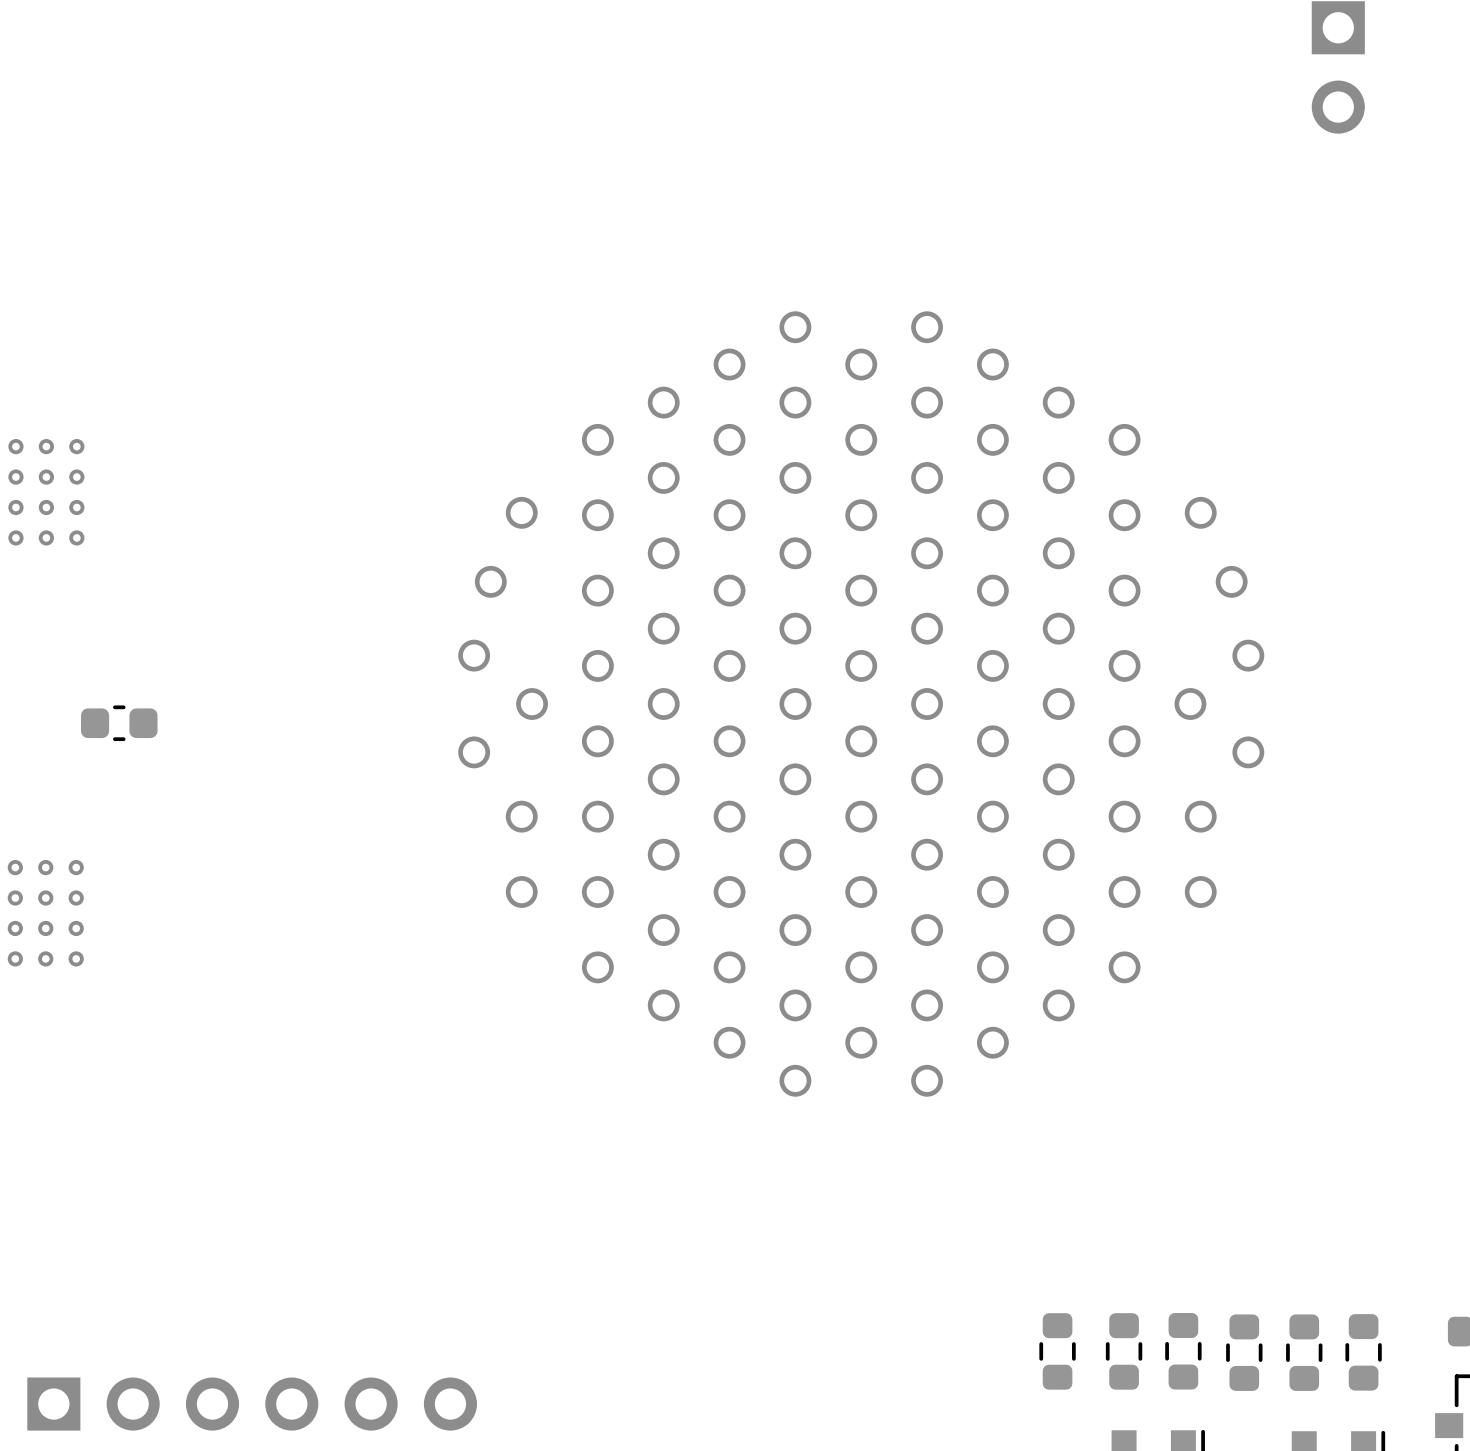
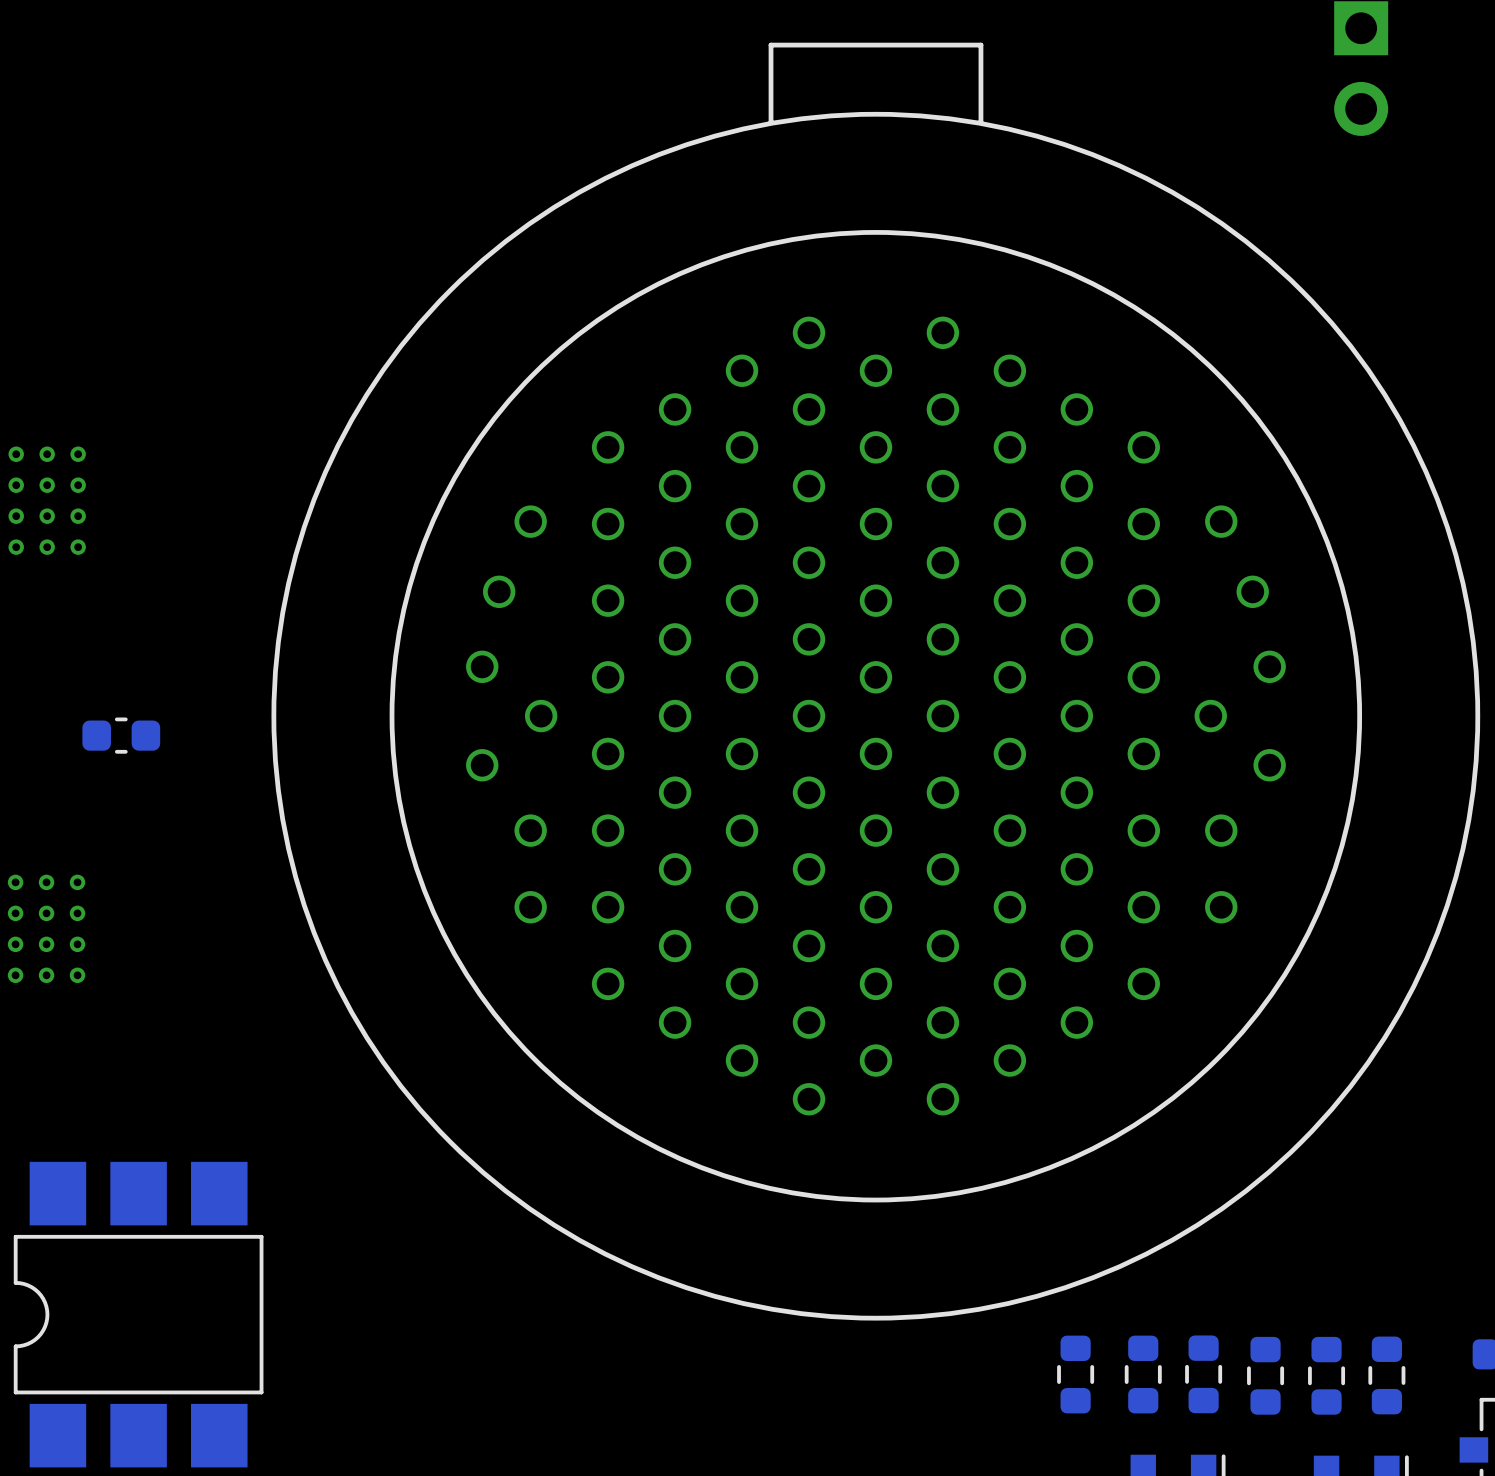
drawing: none -> [271, 111, 1481, 1321]
line: none -> (980, 121) (980, 45) (771, 45) (771, 122)
part: none -> (138, 1314)
part: (252, 1404) -> none

